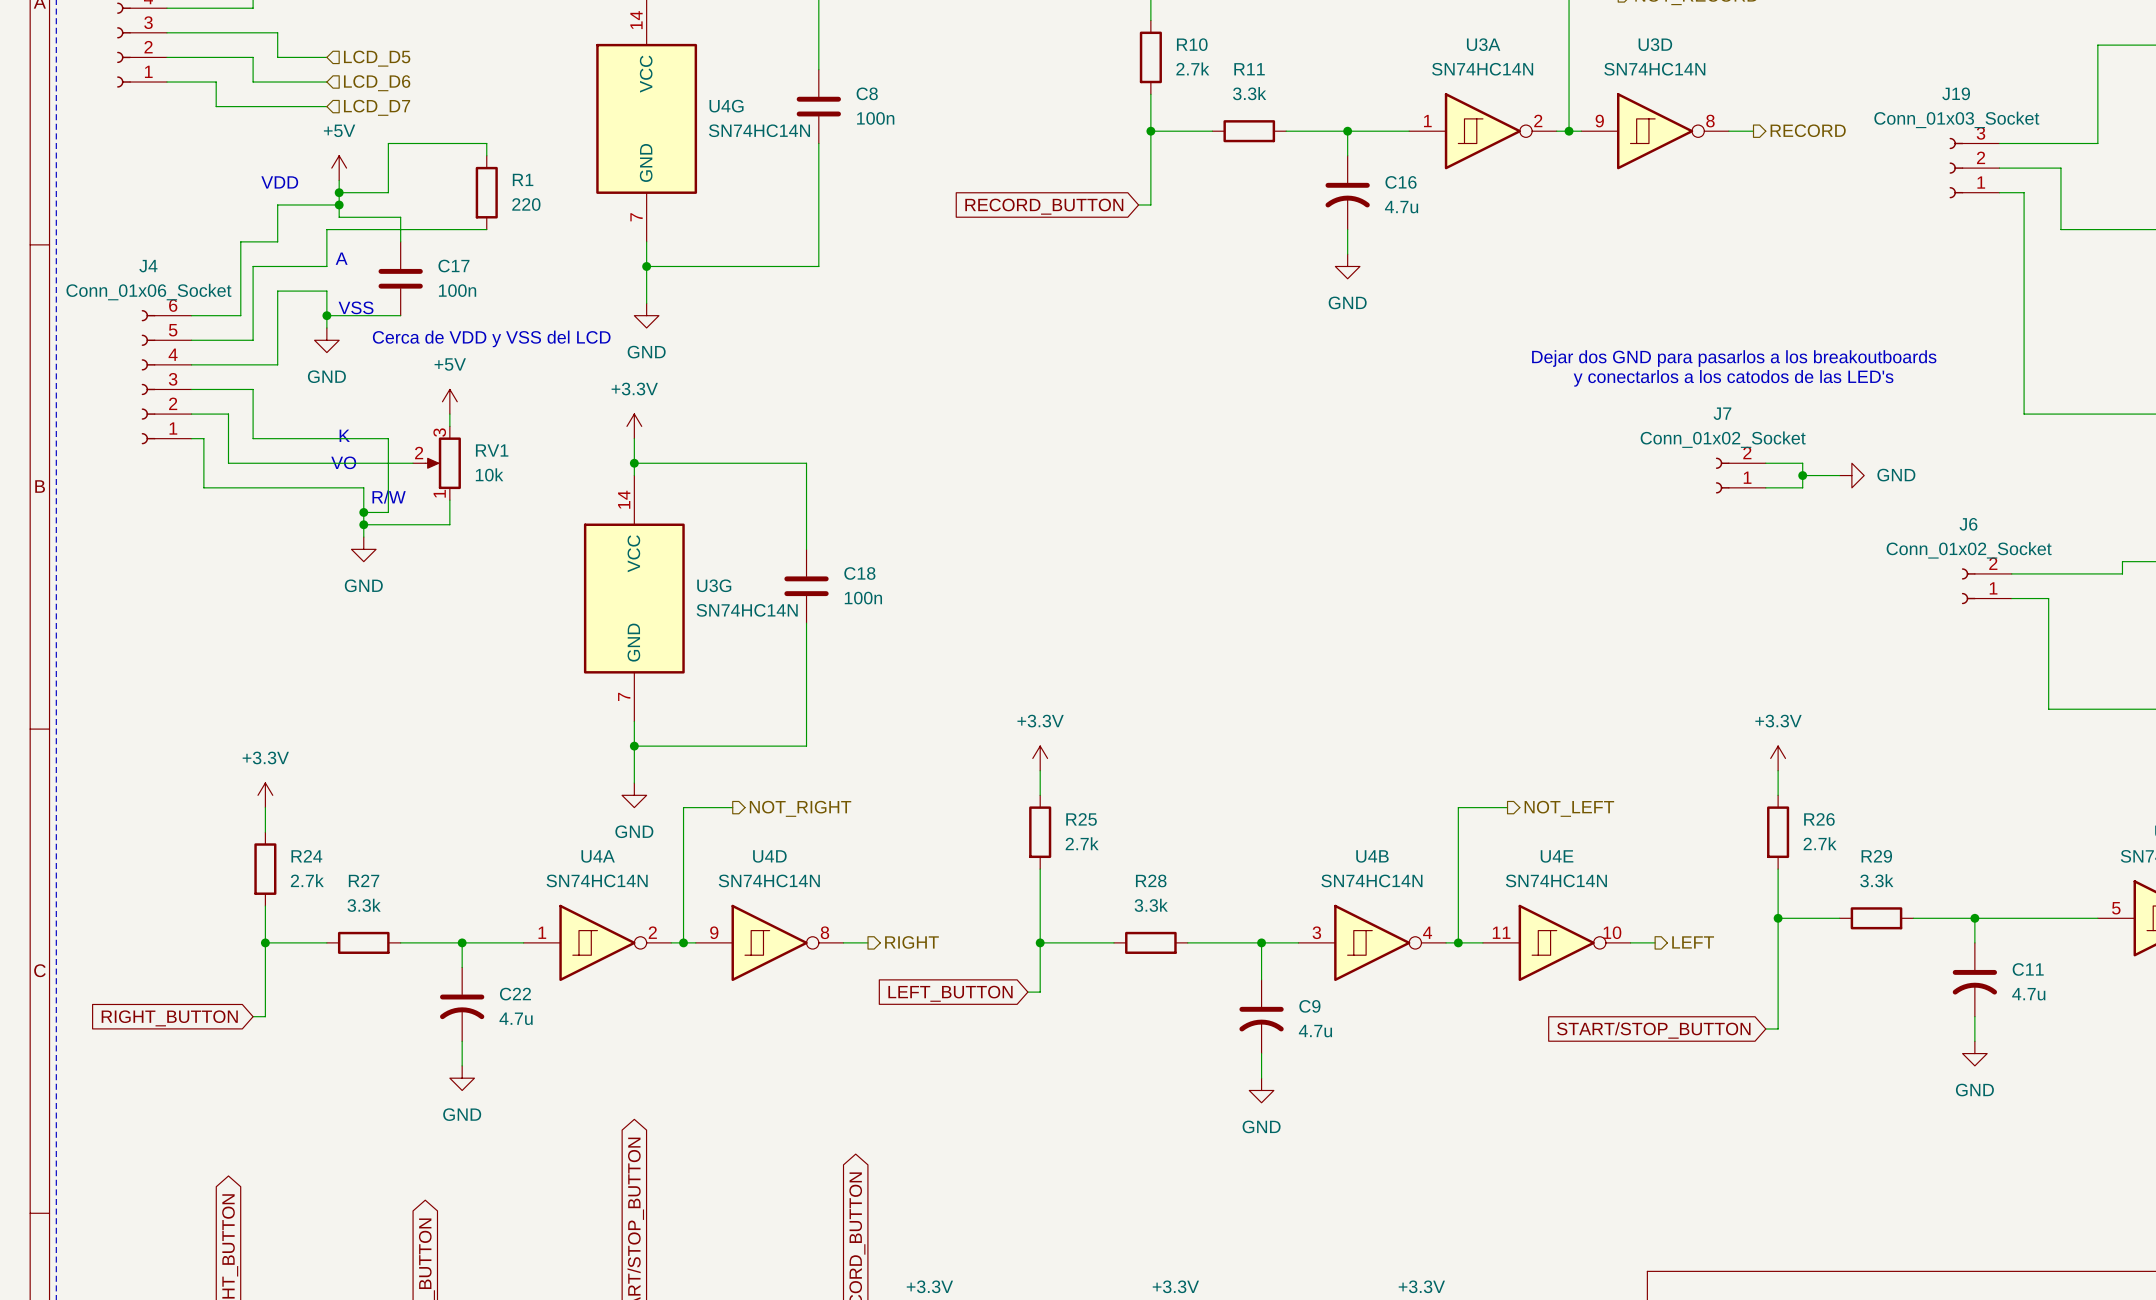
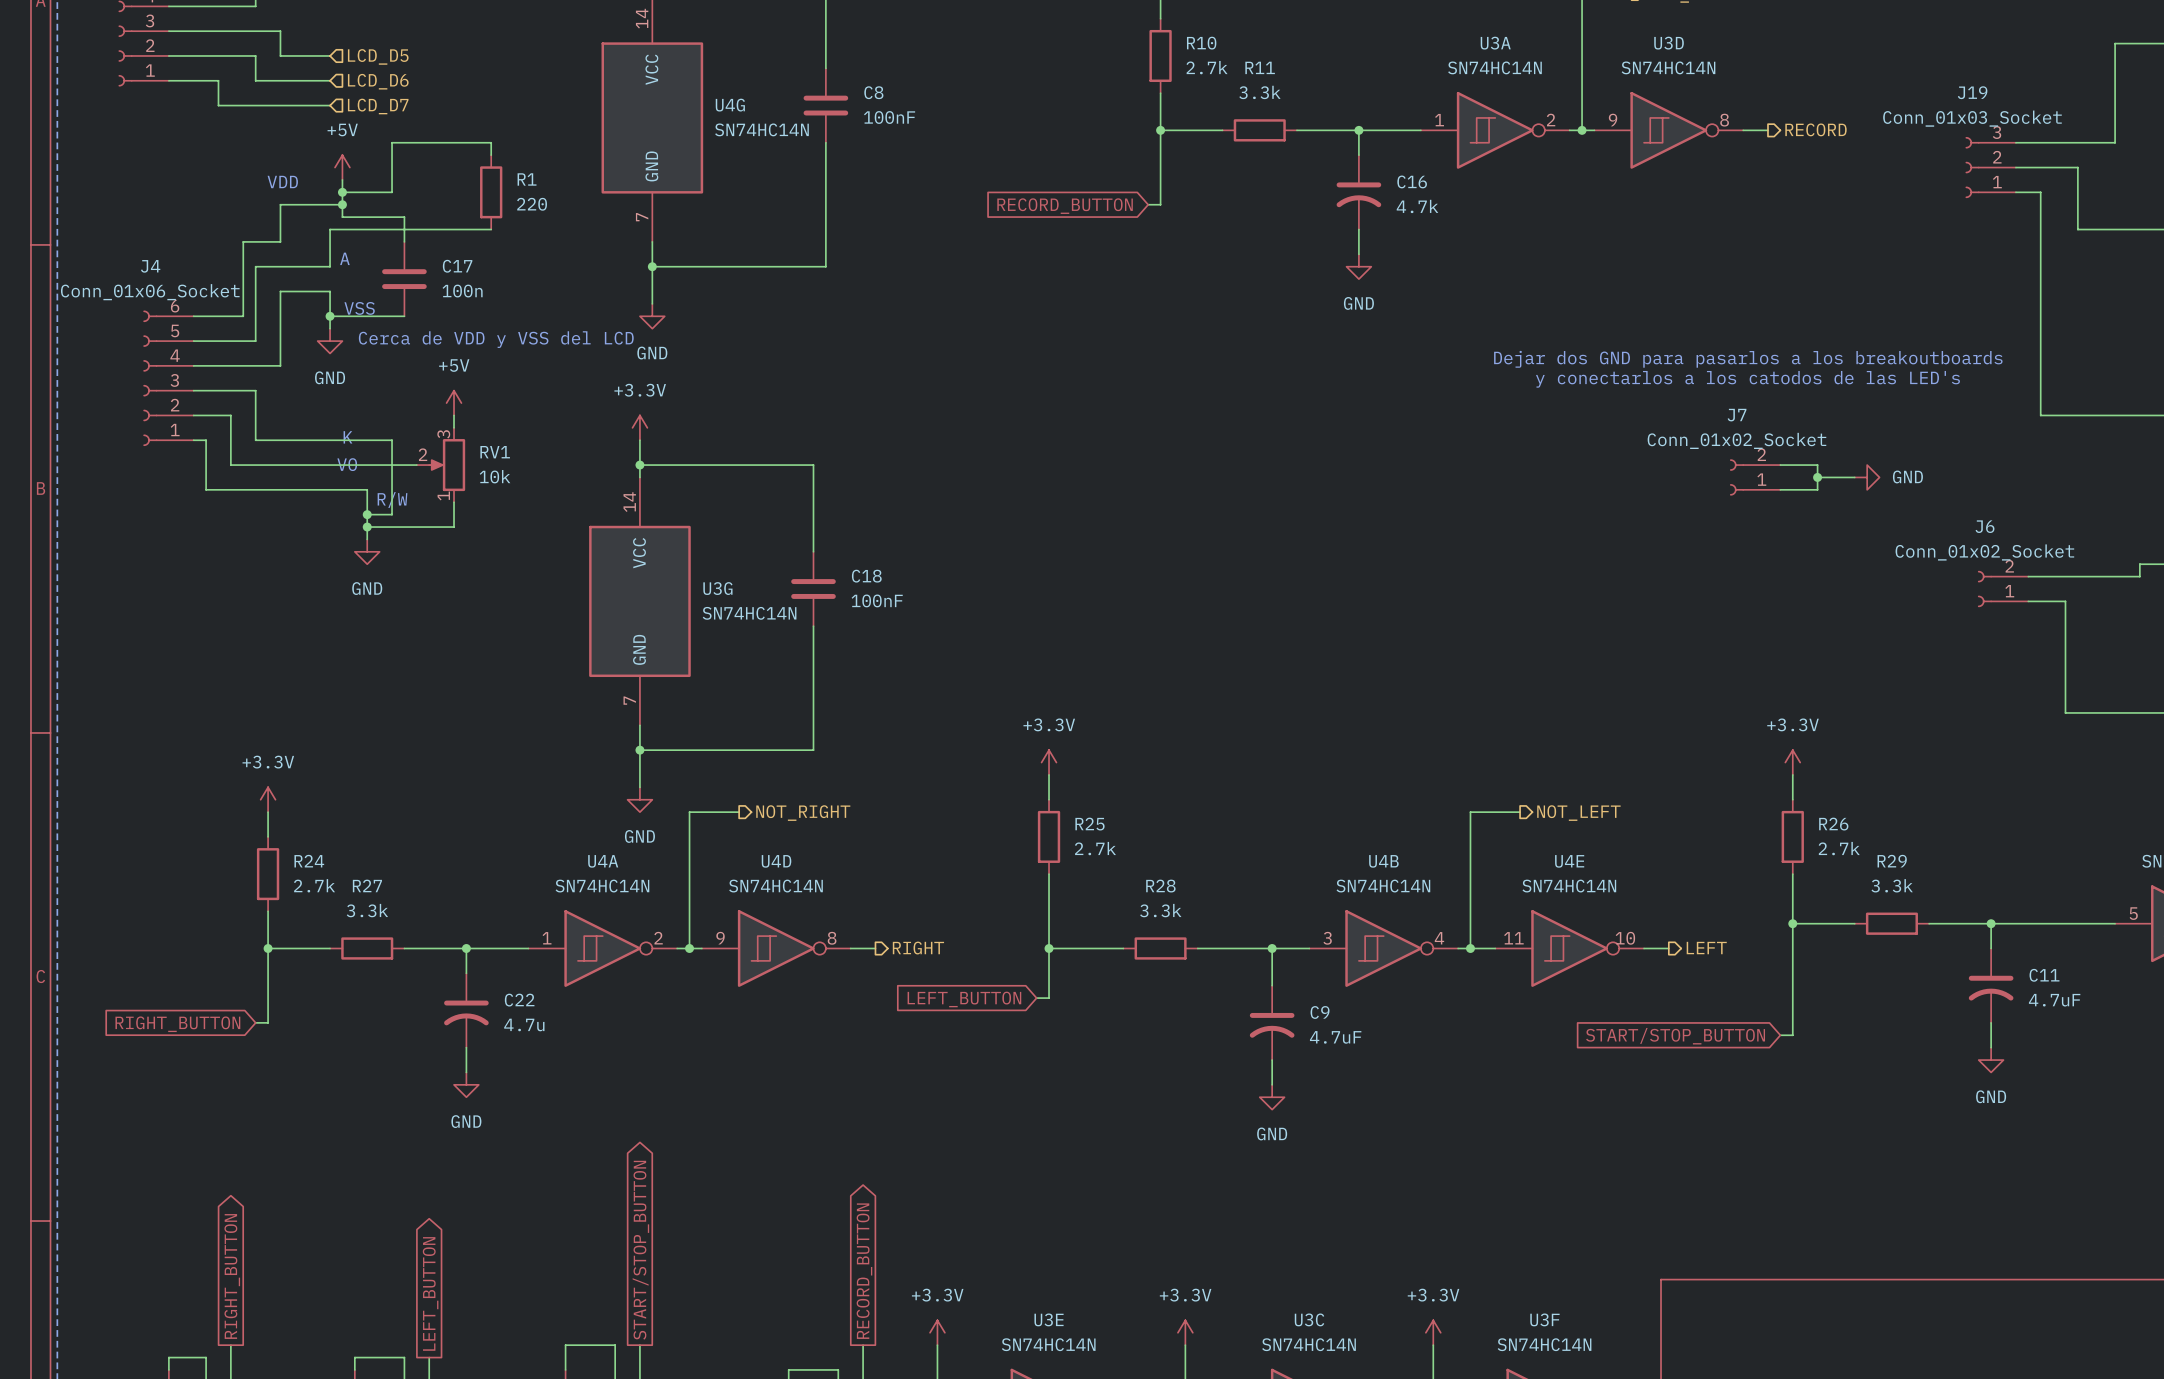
C8 value: 100n (875, 118) -> 100nF (889, 117)
C16 value: 4.7u (1401, 207) -> 4.7k (1417, 206)
C18 value: 100n (863, 598) -> 100nF (877, 600)
C11 value: 4.7u (2028, 994) -> 4.7uF (2054, 1000)
C9 value: 4.7u (1315, 1031) -> 4.7uF (1335, 1037)

